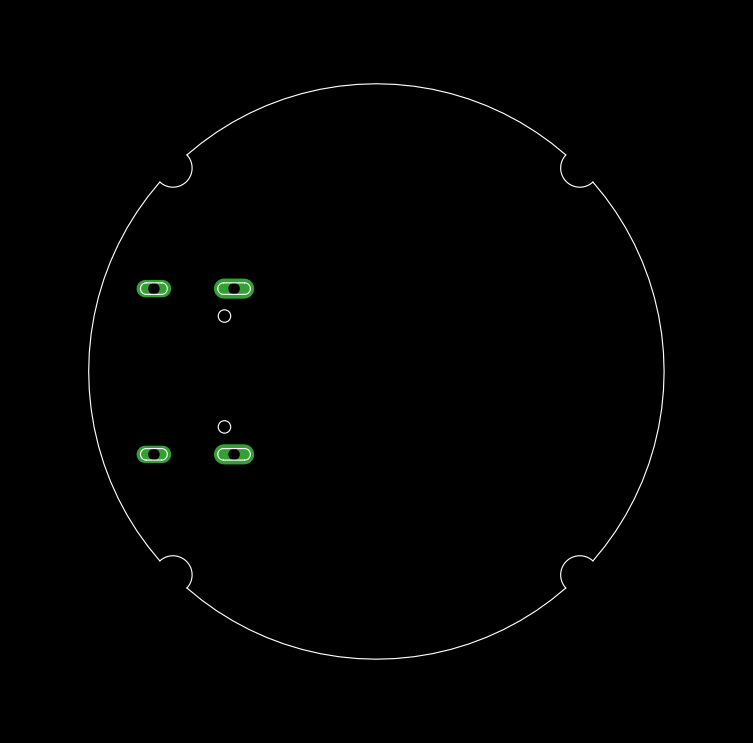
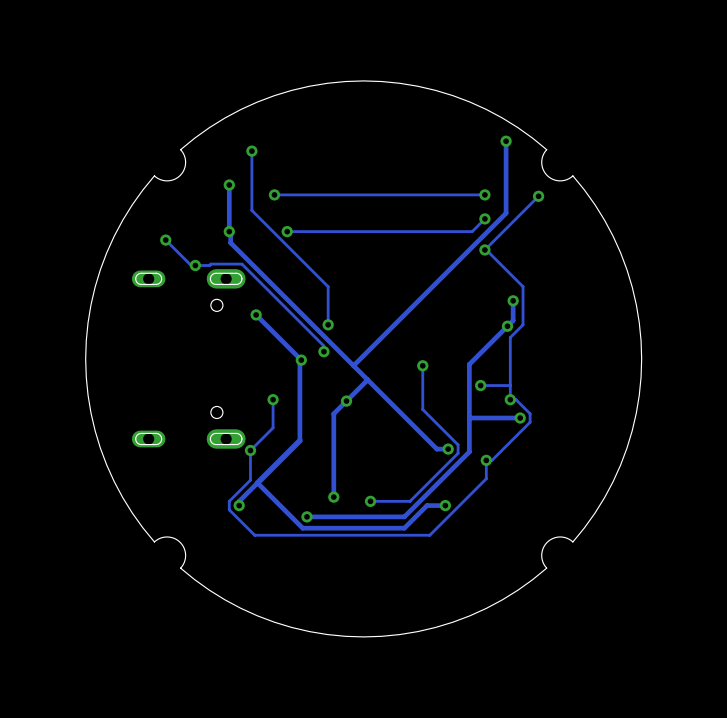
track: none -> (506, 141) (506, 213) (353, 365)
via: none -> (506, 141)
track: none -> (251, 151) (251, 210) (328, 286) (328, 324)
via: none -> (251, 151)
track: none -> (229, 185) (230, 242) (436, 449) (448, 449)
via: none -> (229, 185)
via: none -> (274, 194)
track: none -> (484, 194) (274, 194)
via: none -> (484, 194)
track: none -> (538, 196) (484, 249) (523, 286) (523, 324) (510, 337) (510, 399) (515, 399) (530, 413) (530, 422) (491, 460) (486, 460) (486, 478) (429, 535) (254, 535) (229, 509) (229, 501) (250, 480) (250, 450) (273, 427) (273, 399)
via: none -> (538, 196)
track: none -> (484, 218) (472, 231) (287, 231)
via: none -> (484, 218)
via: none -> (229, 231)
via: none -> (287, 231)
track: none -> (165, 240) (191, 265) (242, 264) (323, 346) (323, 351)
via: none -> (165, 240)
via: none -> (484, 249)
via: none -> (195, 265)
track: none -> (513, 300) (513, 320) (469, 364) (469, 451) (404, 516) (306, 516)
via: none -> (513, 300)
track: none -> (256, 314) (301, 360) (299, 440) (257, 482)
via: none -> (256, 314)
via: none -> (328, 324)
via: none -> (507, 326)
via: none -> (323, 351)
via: none -> (301, 360)
track: none -> (422, 365) (422, 409) (458, 444) (458, 453) (410, 501) (370, 501)
via: none -> (422, 365)
track: none -> (367, 379) (333, 413) (333, 497)
via: none -> (480, 385)
track: none -> (510, 385) (480, 385)
via: none -> (273, 399)
via: none -> (510, 399)
via: none -> (346, 401)
track: none -> (520, 418) (469, 418)
via: none -> (520, 418)
via: none -> (448, 449)
via: none -> (250, 450)
via: none -> (486, 460)
track: none -> (257, 482) (239, 501) (239, 505)
track: none -> (257, 482) (302, 528) (404, 528) (427, 505) (445, 505)
via: none -> (333, 497)
via: none -> (370, 501)
via: none -> (239, 505)
via: none -> (445, 505)
via: none -> (306, 516)

